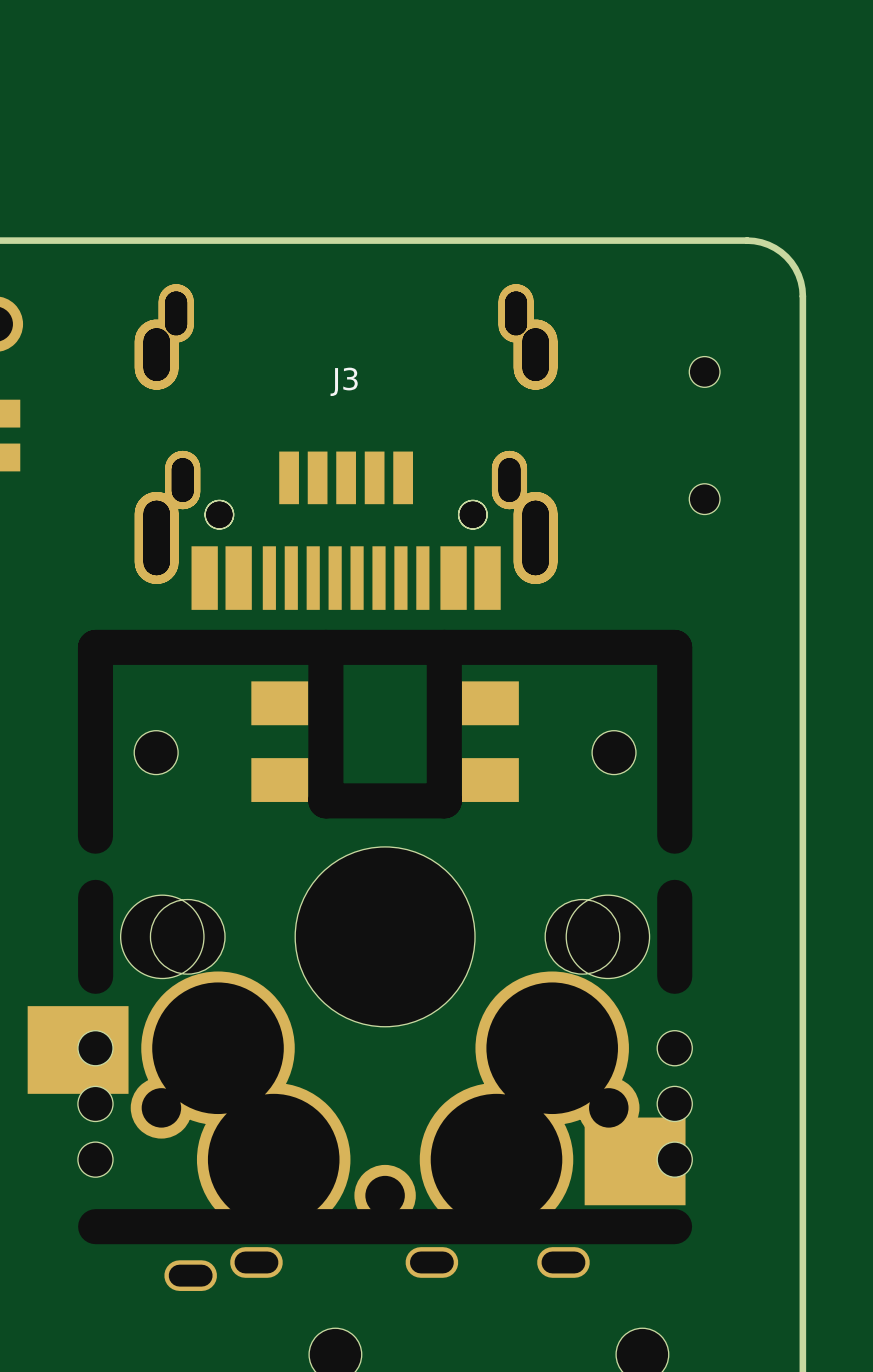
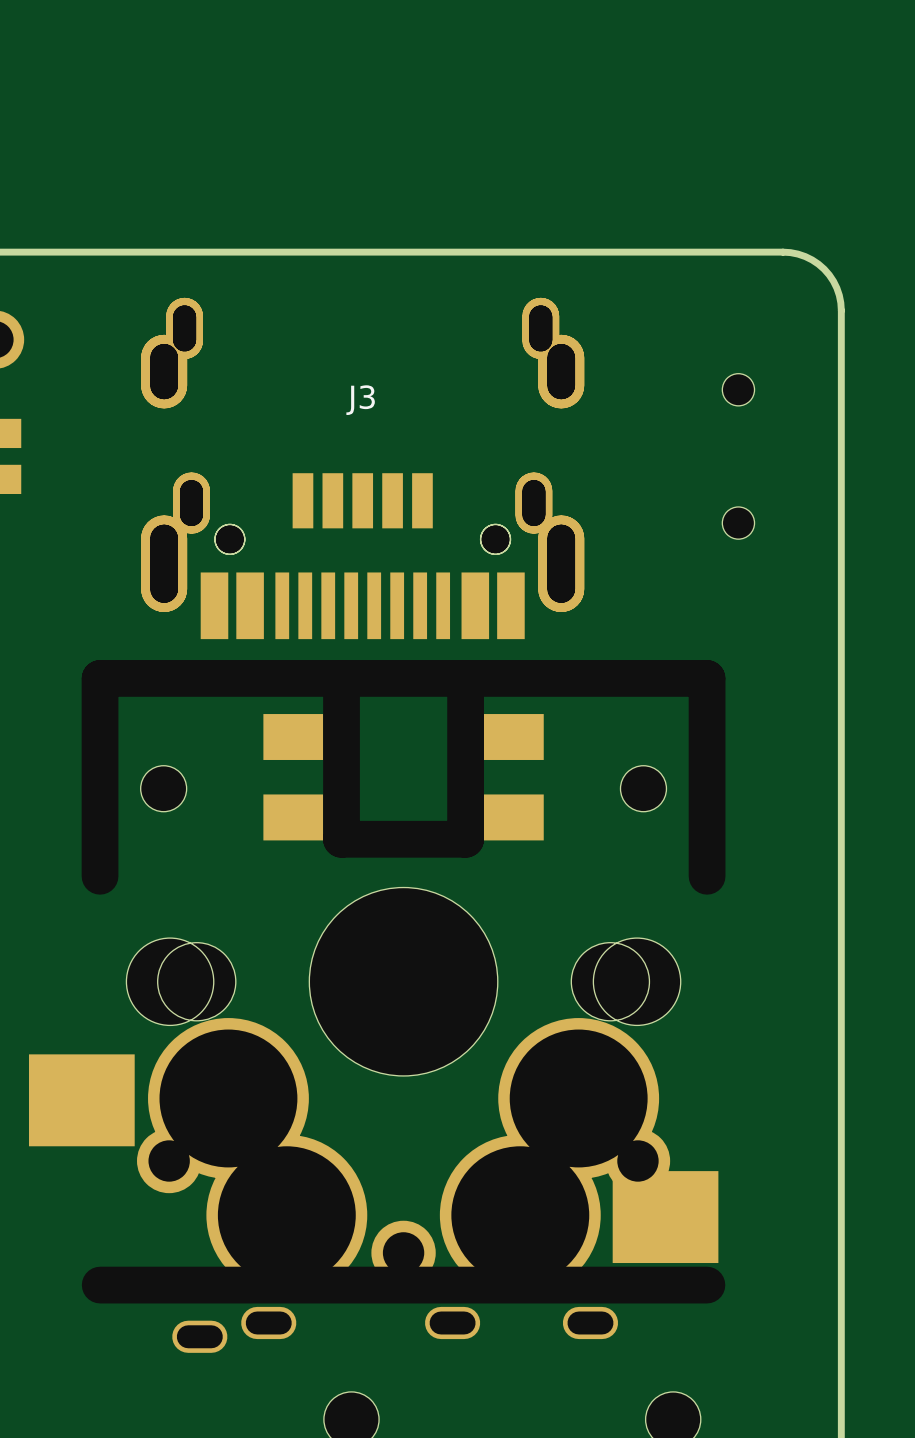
part footprint: [27, 629, 693, 1245] -> [28, 660, 726, 1304]

